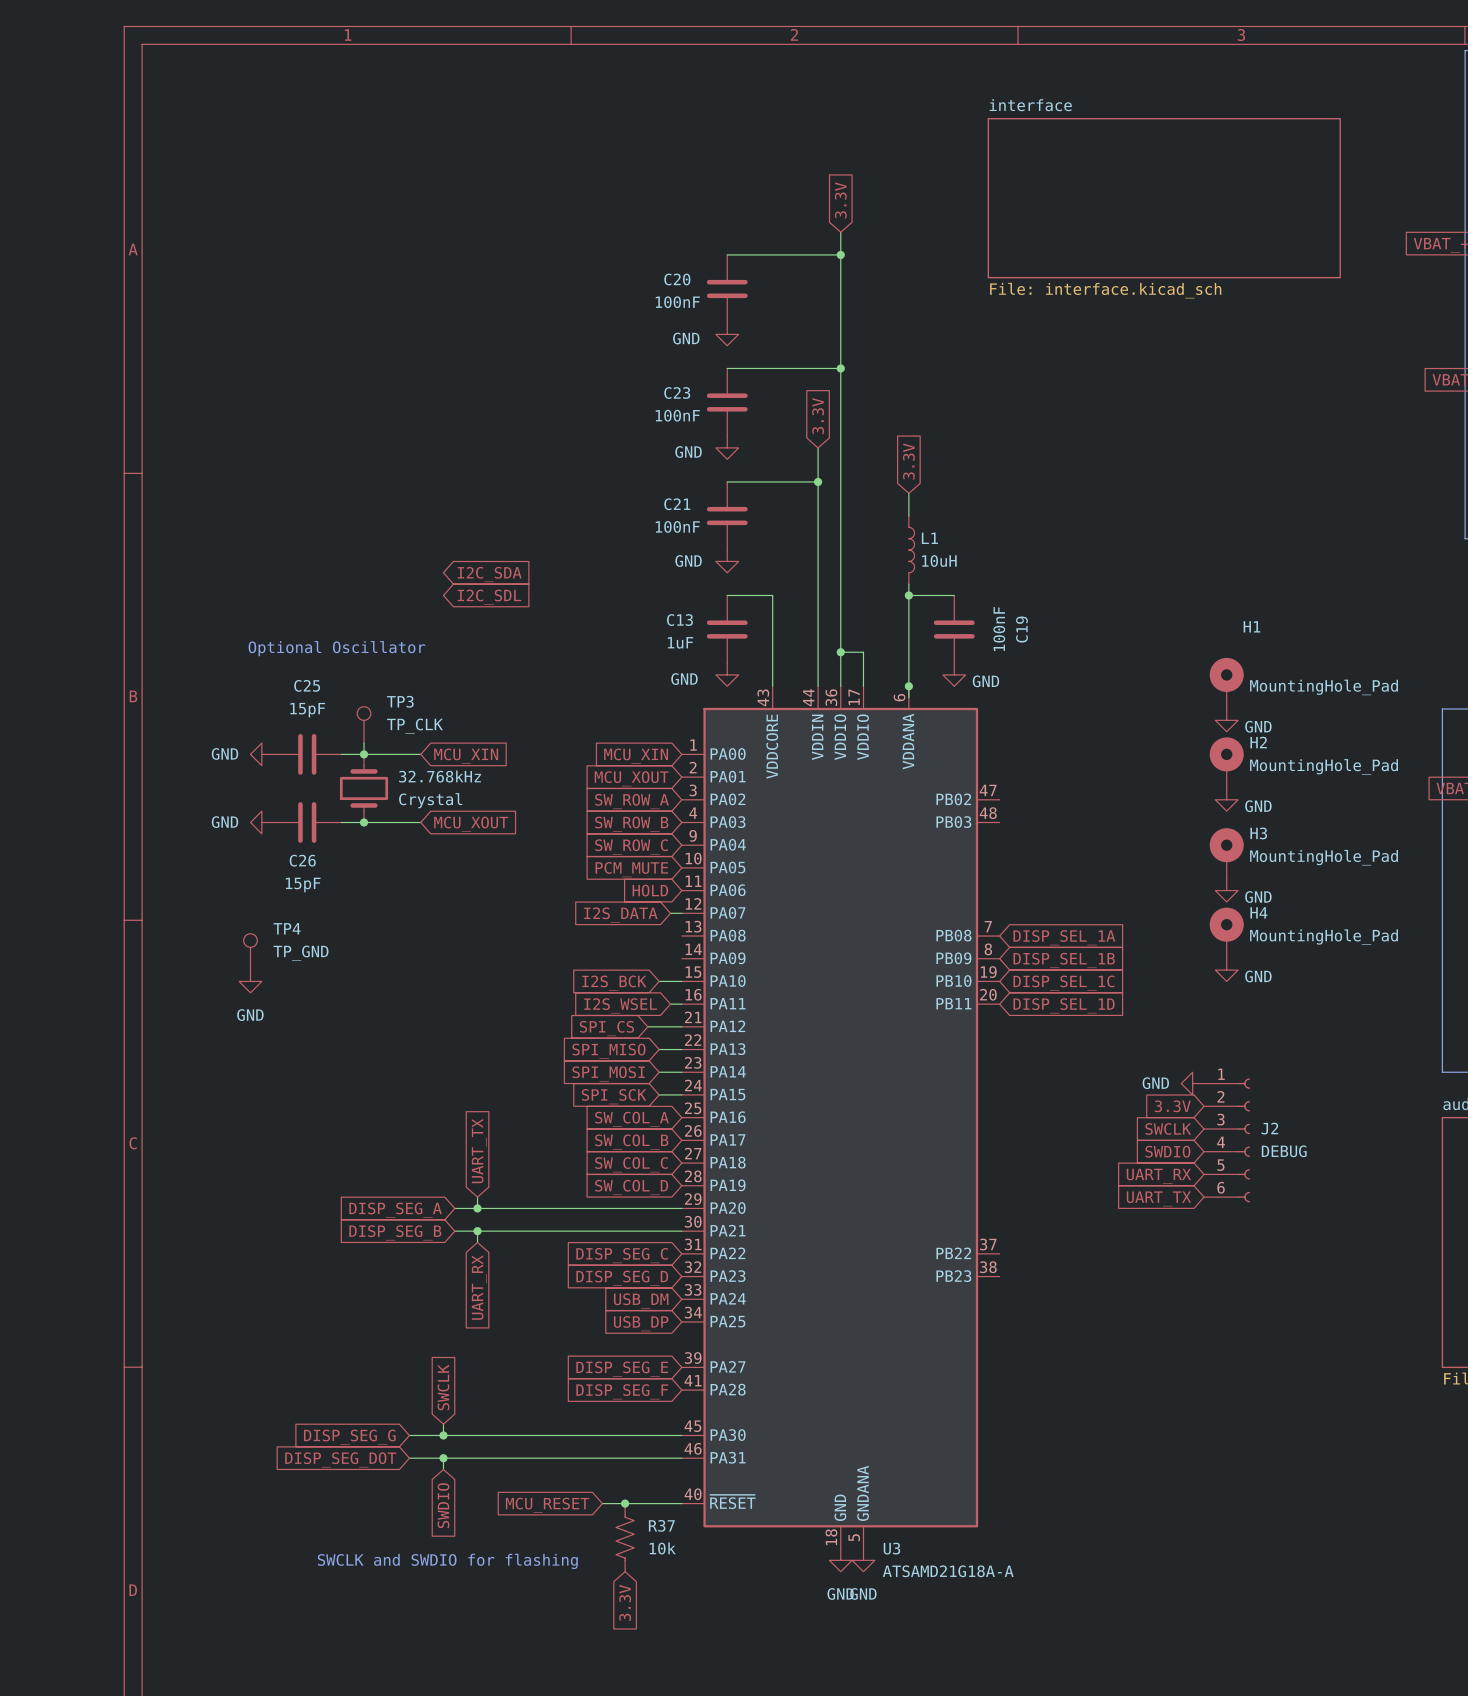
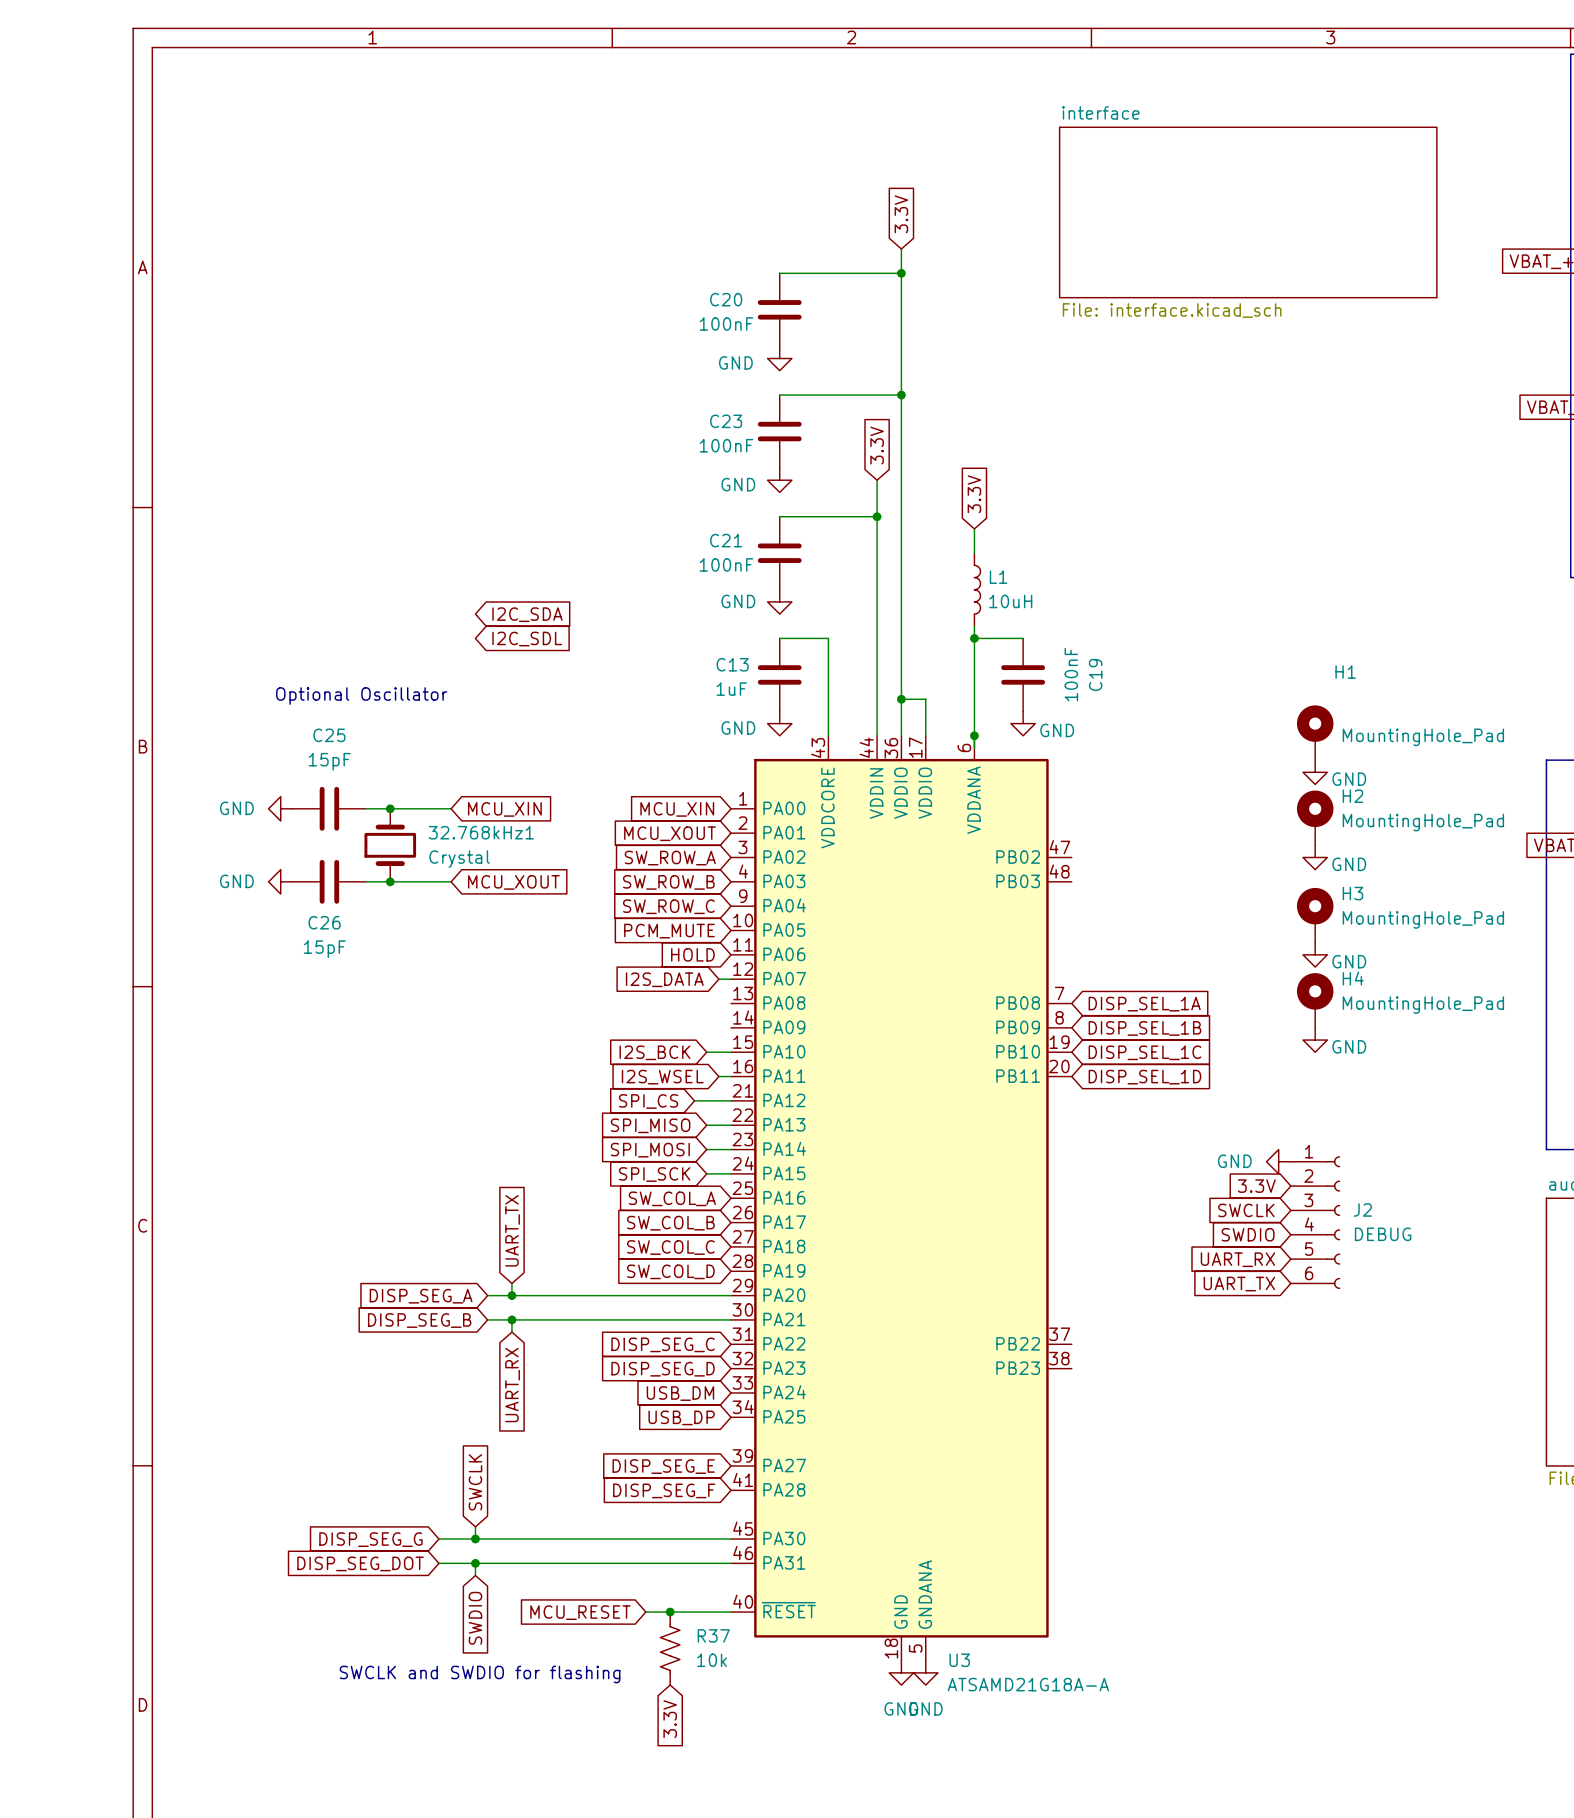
TP3: TP_CLK (364, 724) -> none
wire: (364, 743) (364, 754) -> none
32.768kHz name: 32.768kHz (440, 776) -> 32.768kHz1 (481, 832)
TP4: TP_GND (250, 951) -> none
power symbol: GND (250, 981) -> none

